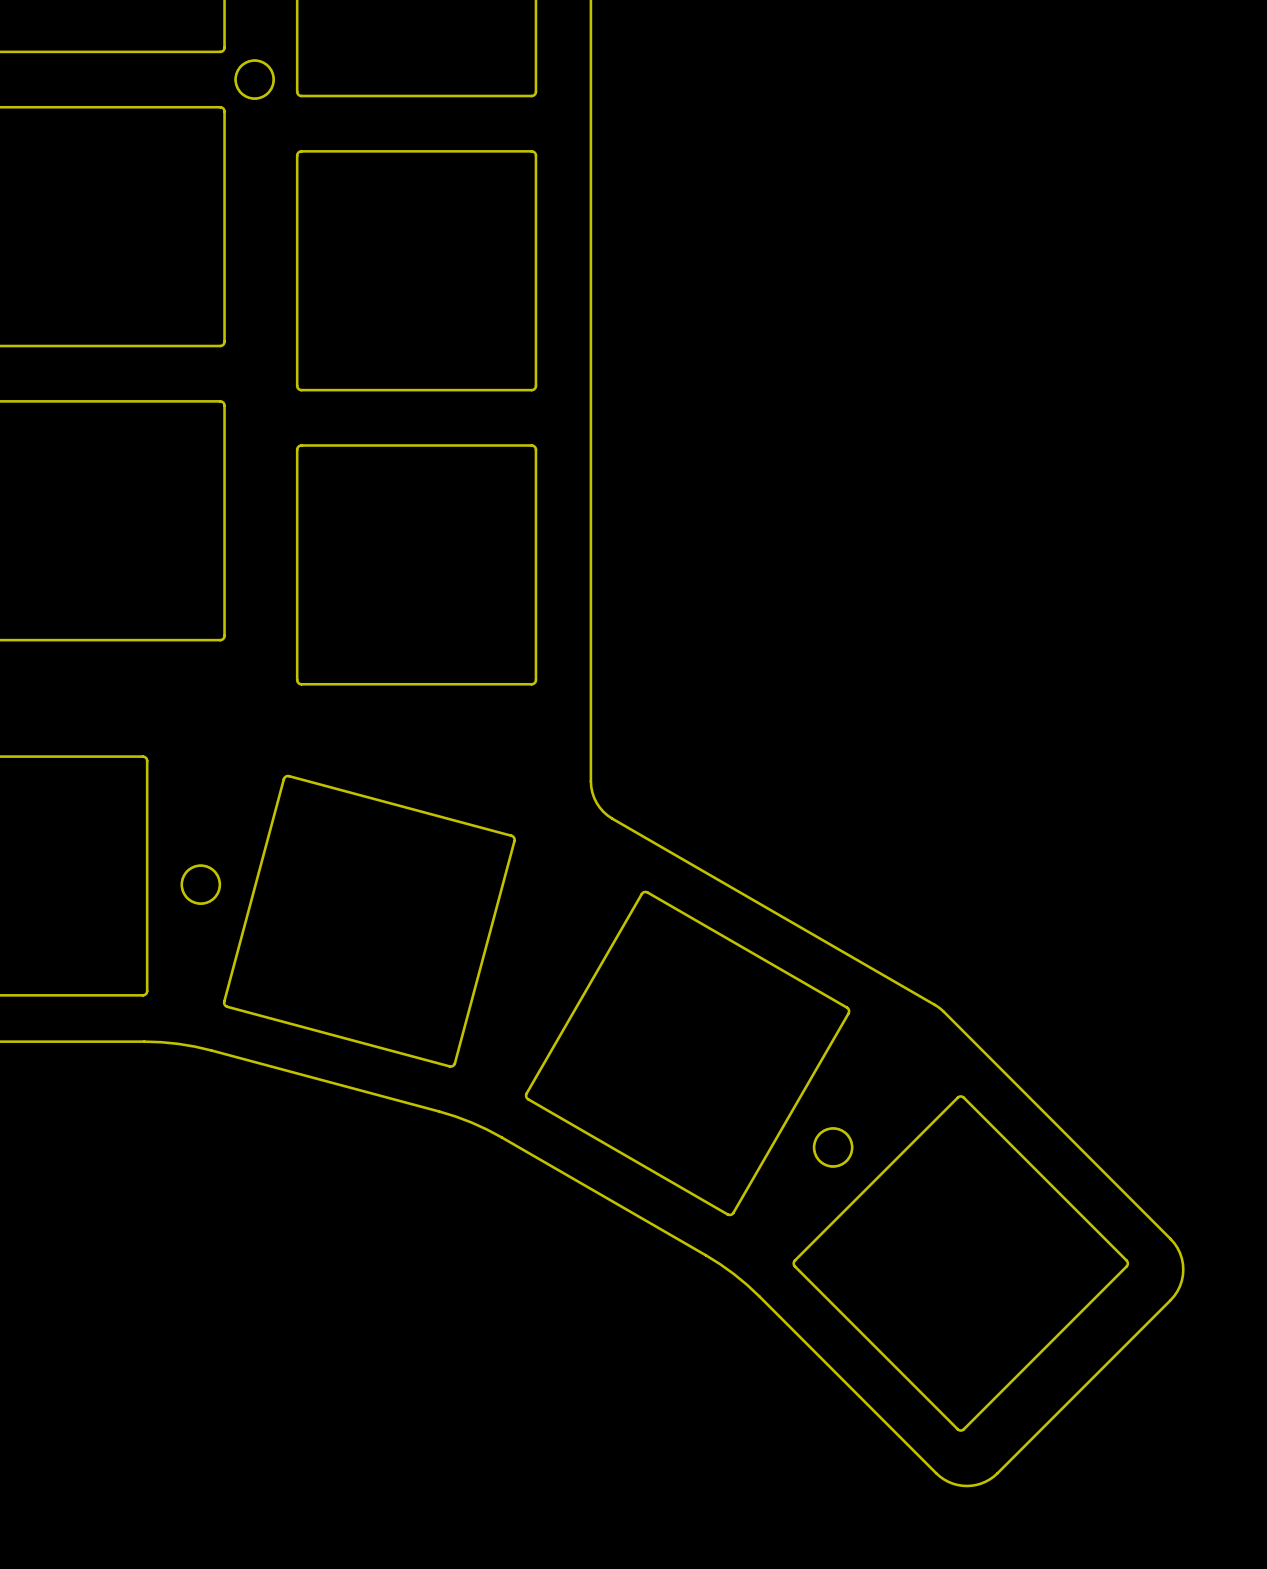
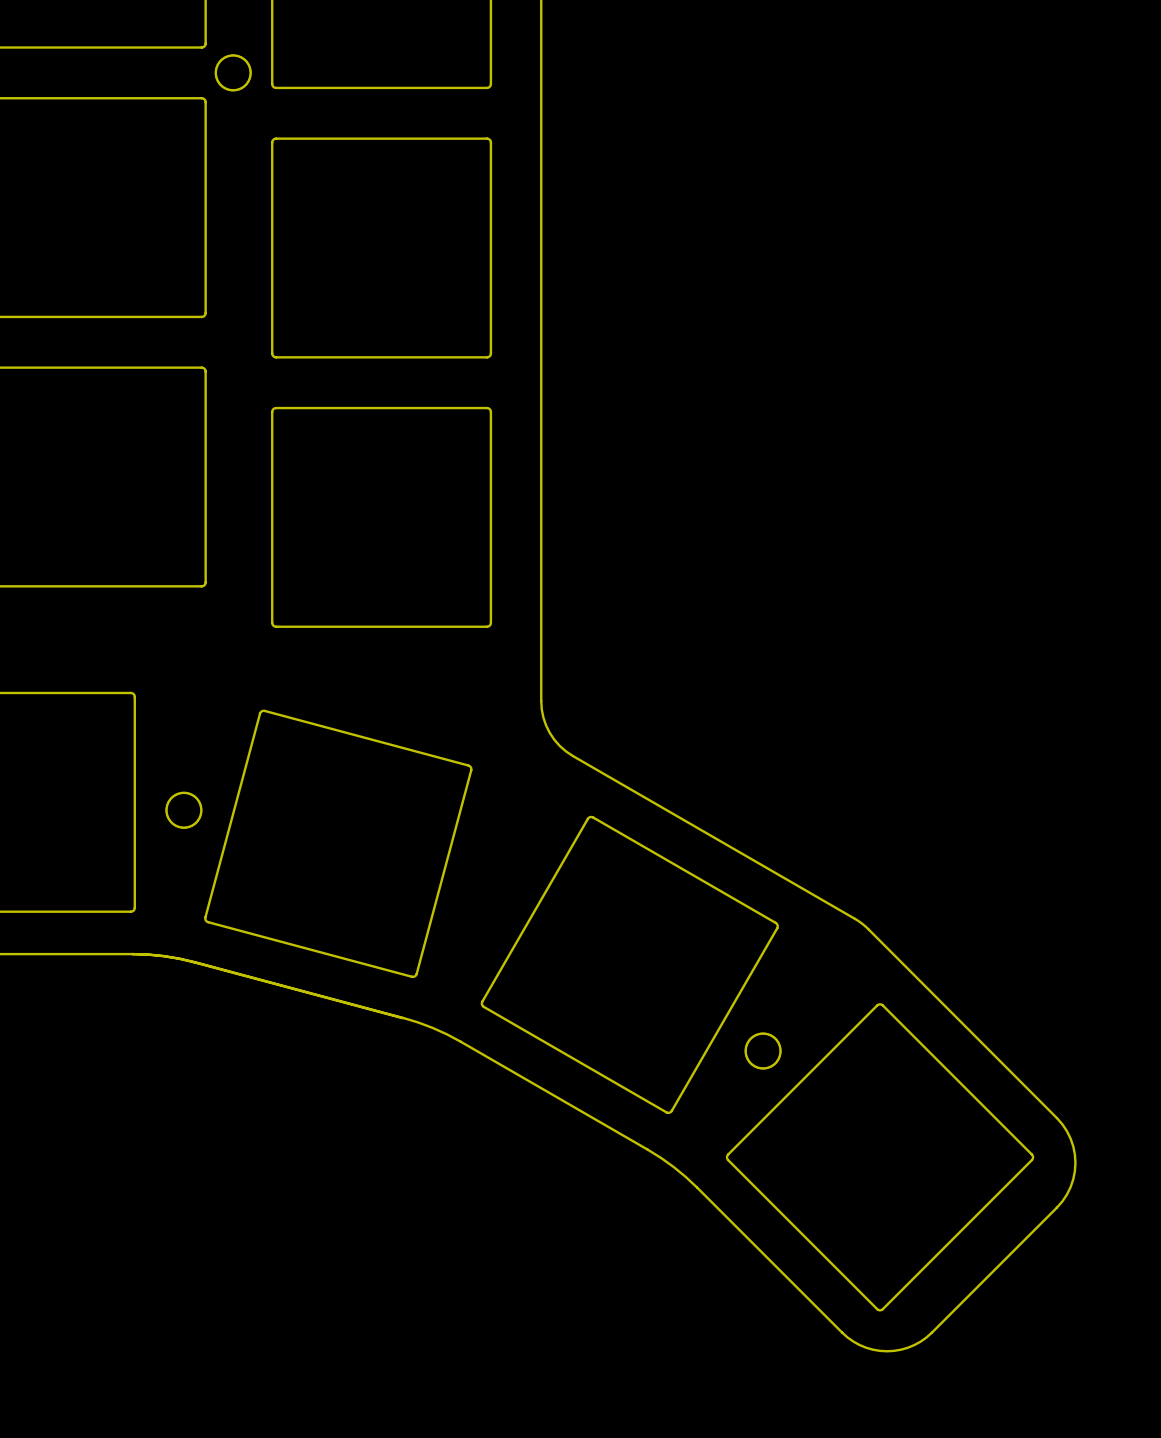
board edge: (590, 765) (592, 792) (596, 802) (607, 815) (941, 1009) (1174, 1243) (1182, 1263) (1180, 1286) (1170, 1300) (993, 1476) (976, 1484) (957, 1484) (948, 1481) (936, 1473) (759, 1296) (733, 1274) (705, 1255) (501, 1137) (471, 1122) (439, 1111) -> (541, 701) (543, 717) (549, 732) (566, 751) (861, 923) (1056, 1118) (1066, 1131) (1073, 1146) (1074, 1171) (1070, 1187) (1062, 1201) (931, 1332) (920, 1341) (907, 1347) (887, 1351) (872, 1349) (853, 1341) (697, 1187) (673, 1166) (647, 1149) (447, 1034) (403, 1018) (195, 962) (164, 956) (132, 954)

